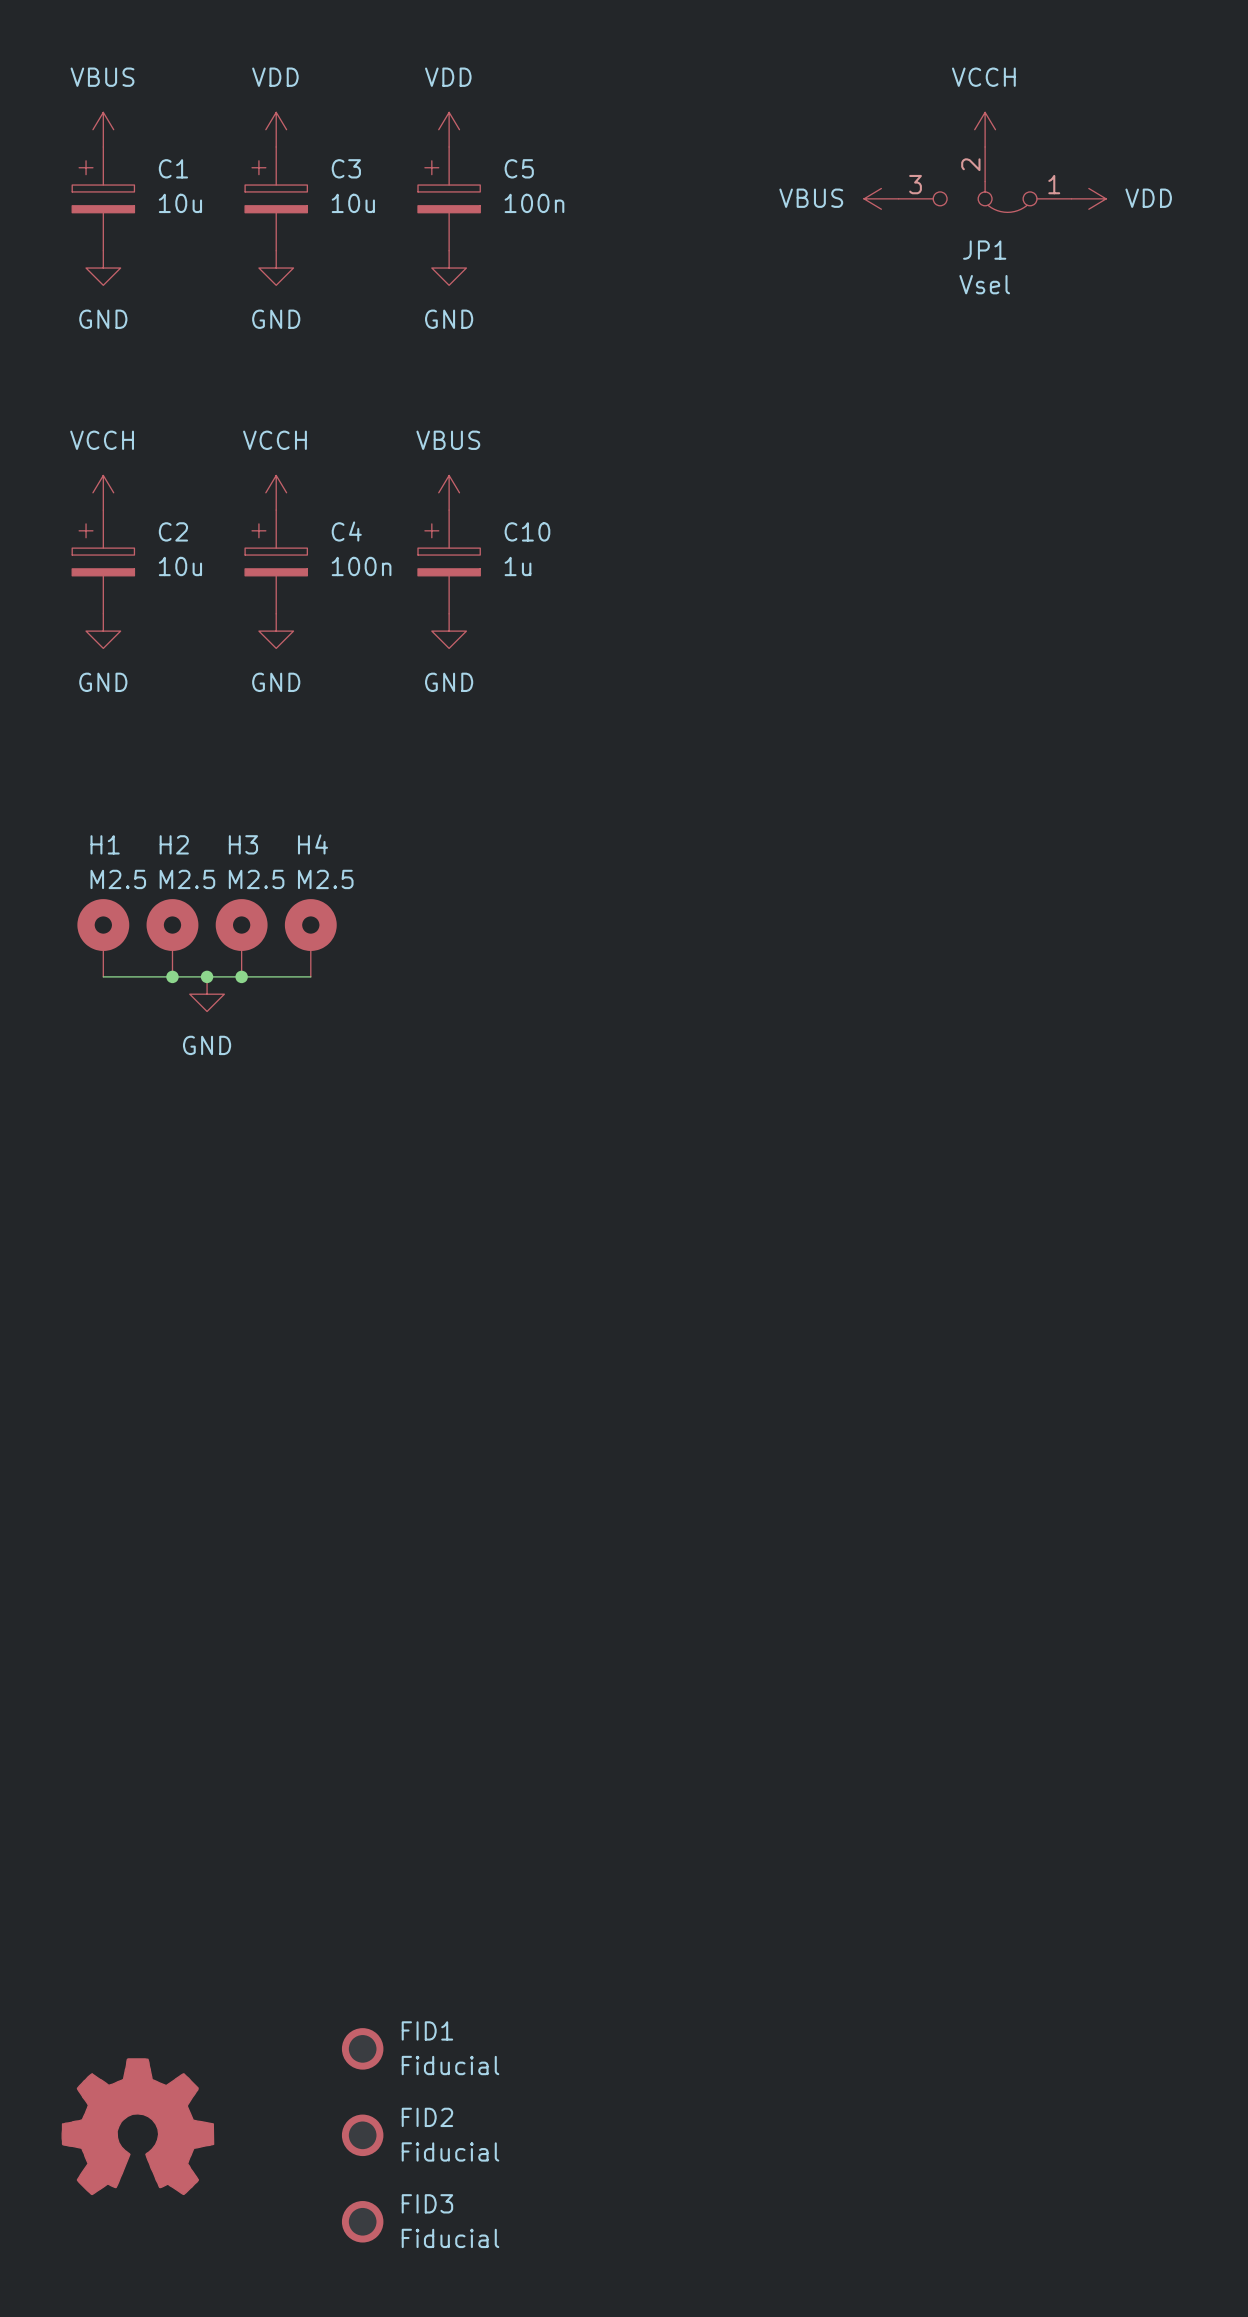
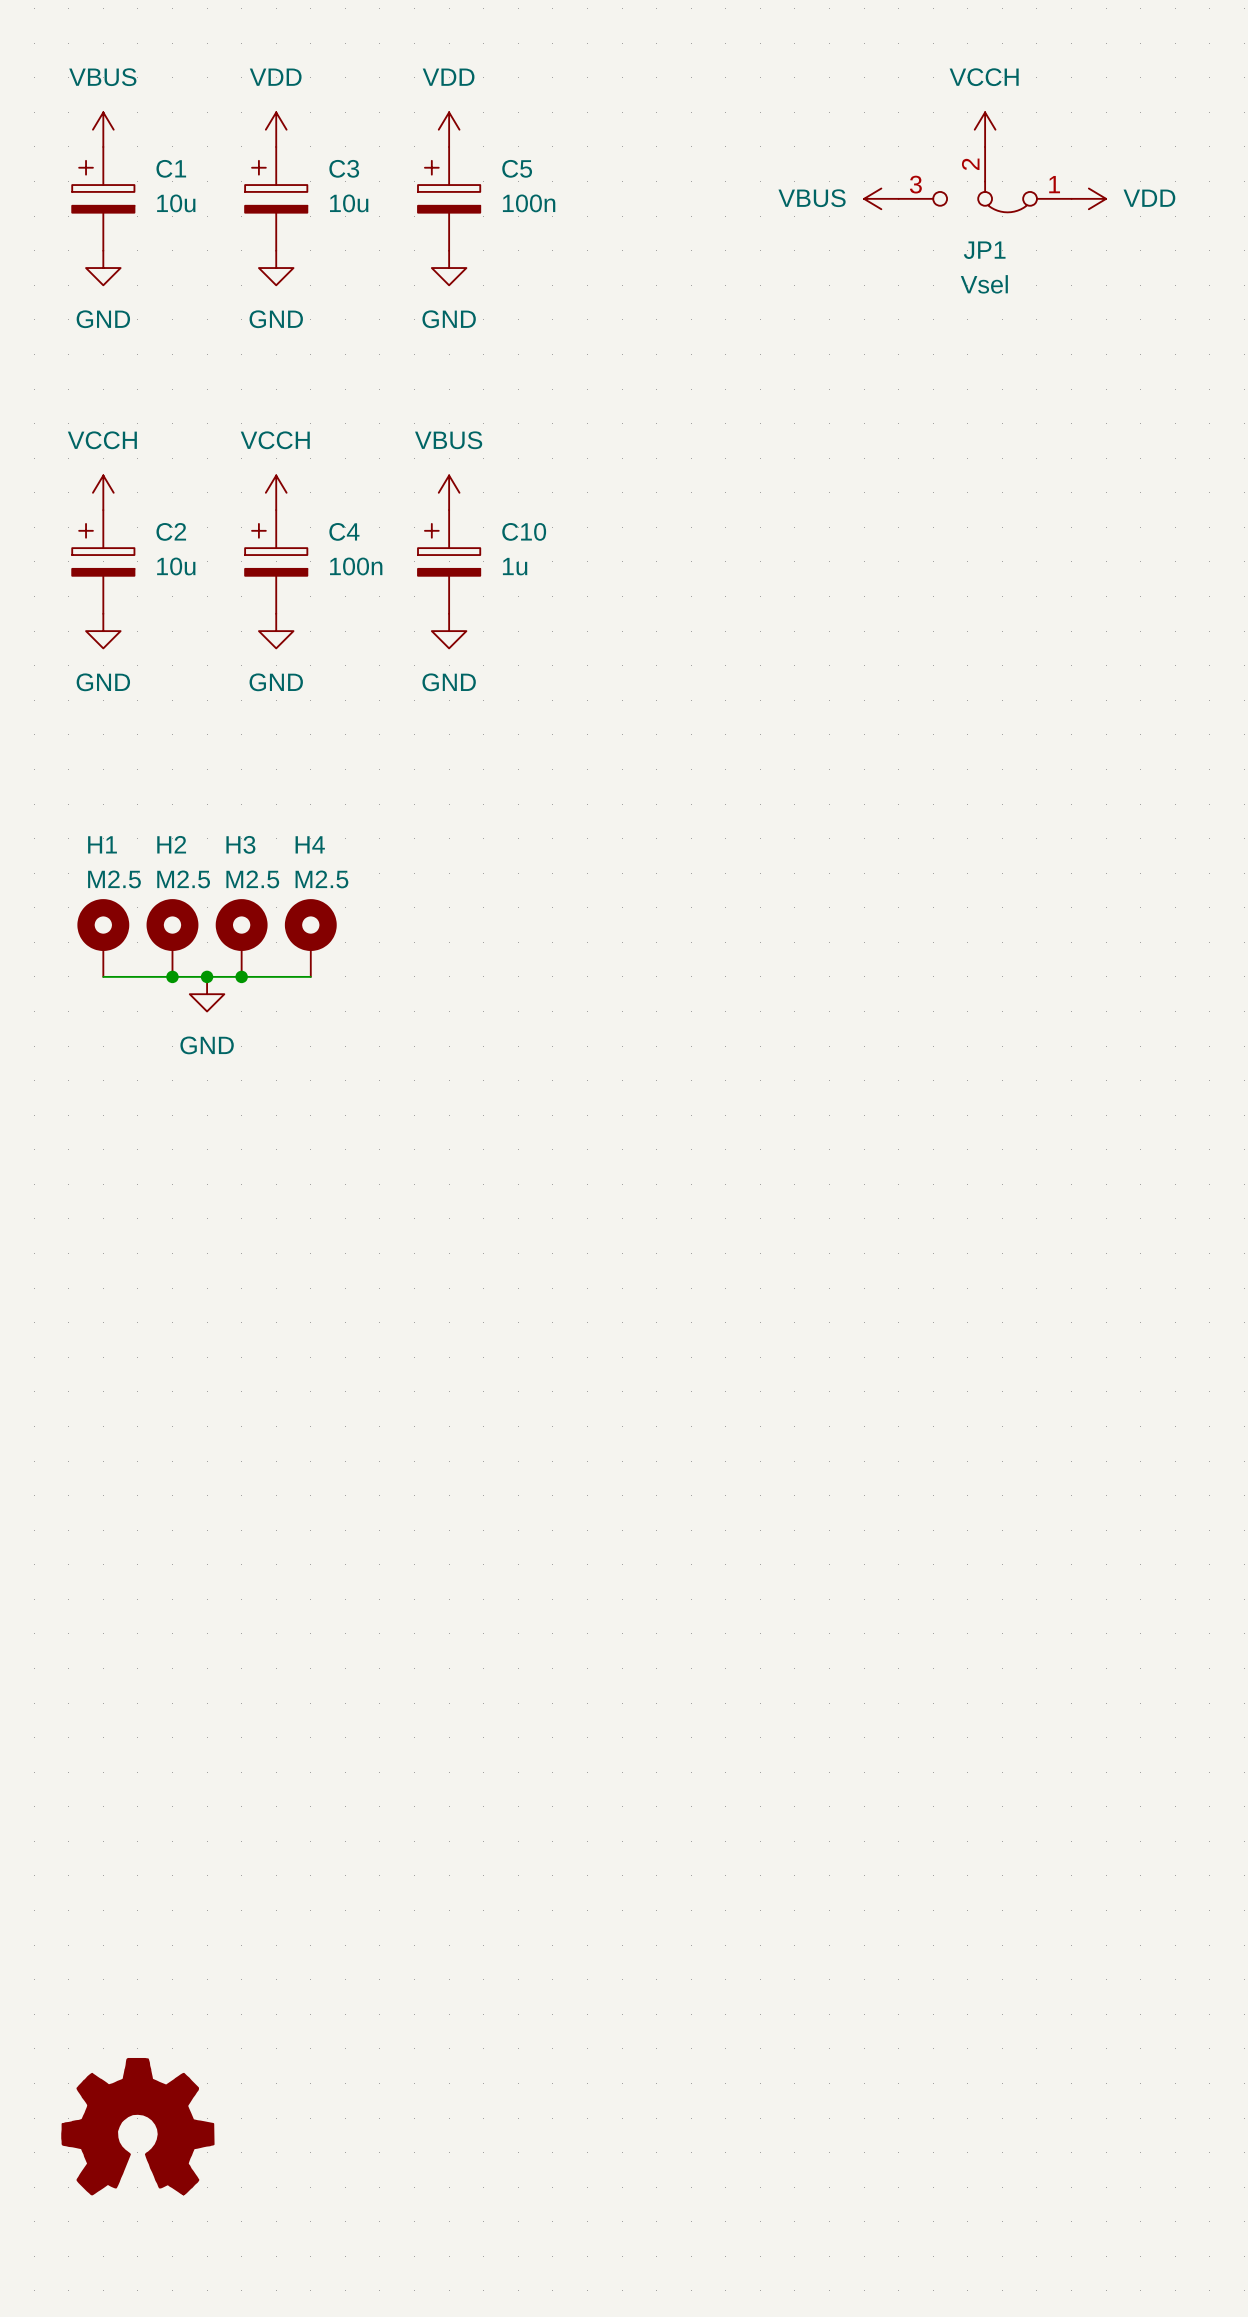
FID1: Fiducial (362, 2048) -> none
FID2: Fiducial (362, 2135) -> none
FID3: Fiducial (362, 2221) -> none

